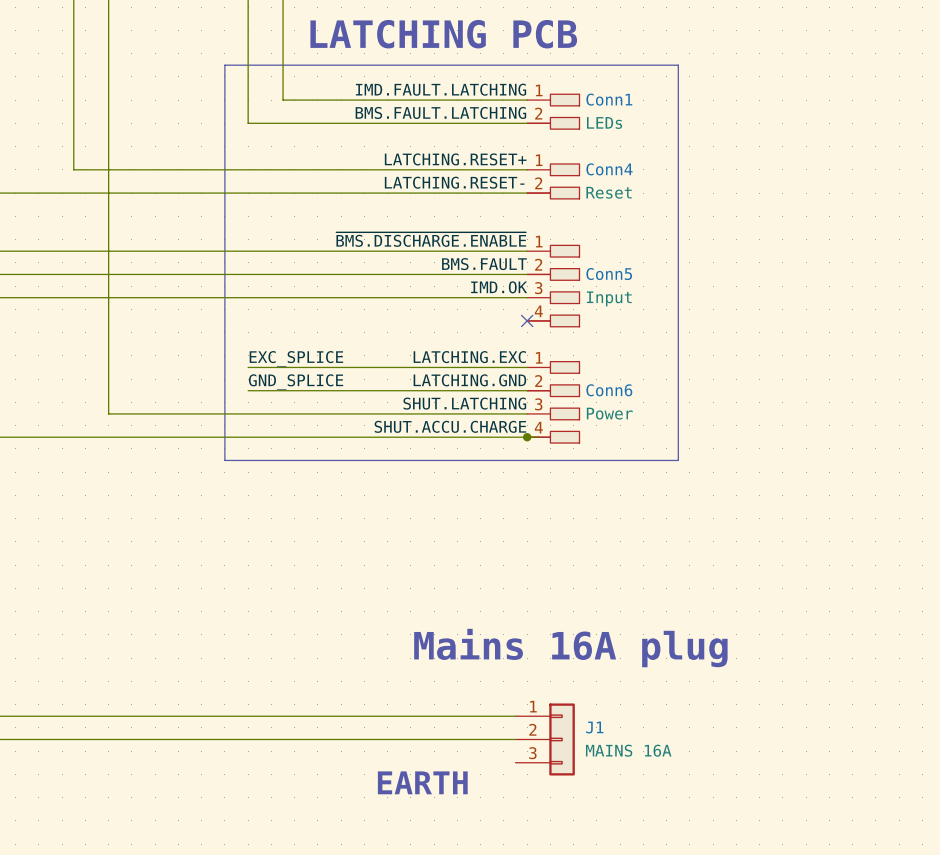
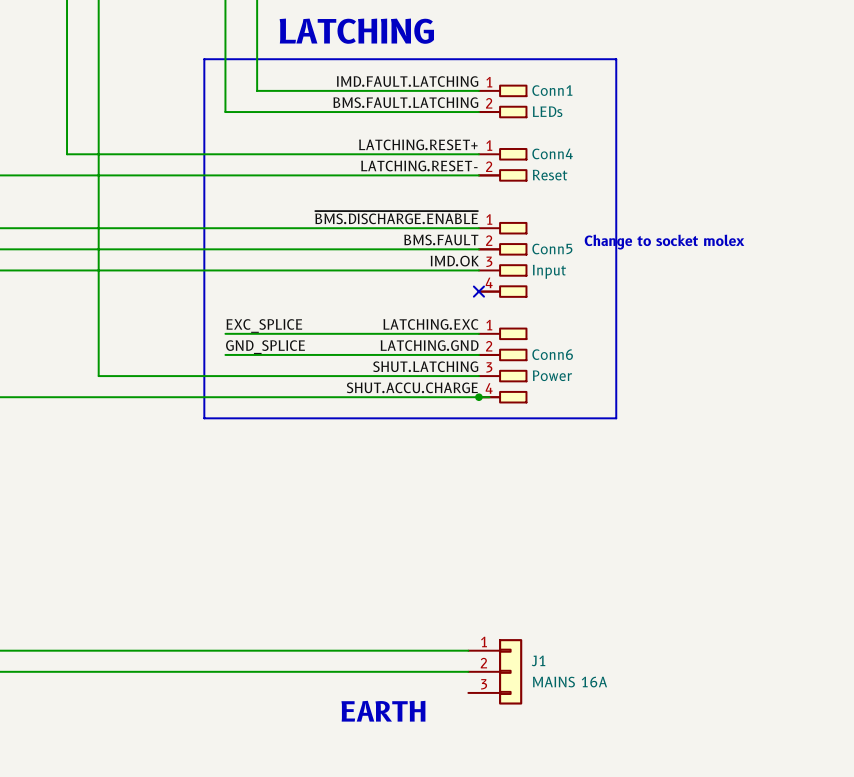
text: LATCHING PCB (443, 34) -> LATCHING (356, 31)
text: none -> Change to socket molex (664, 242)
text: Mains 16A plug (570, 648) -> none

